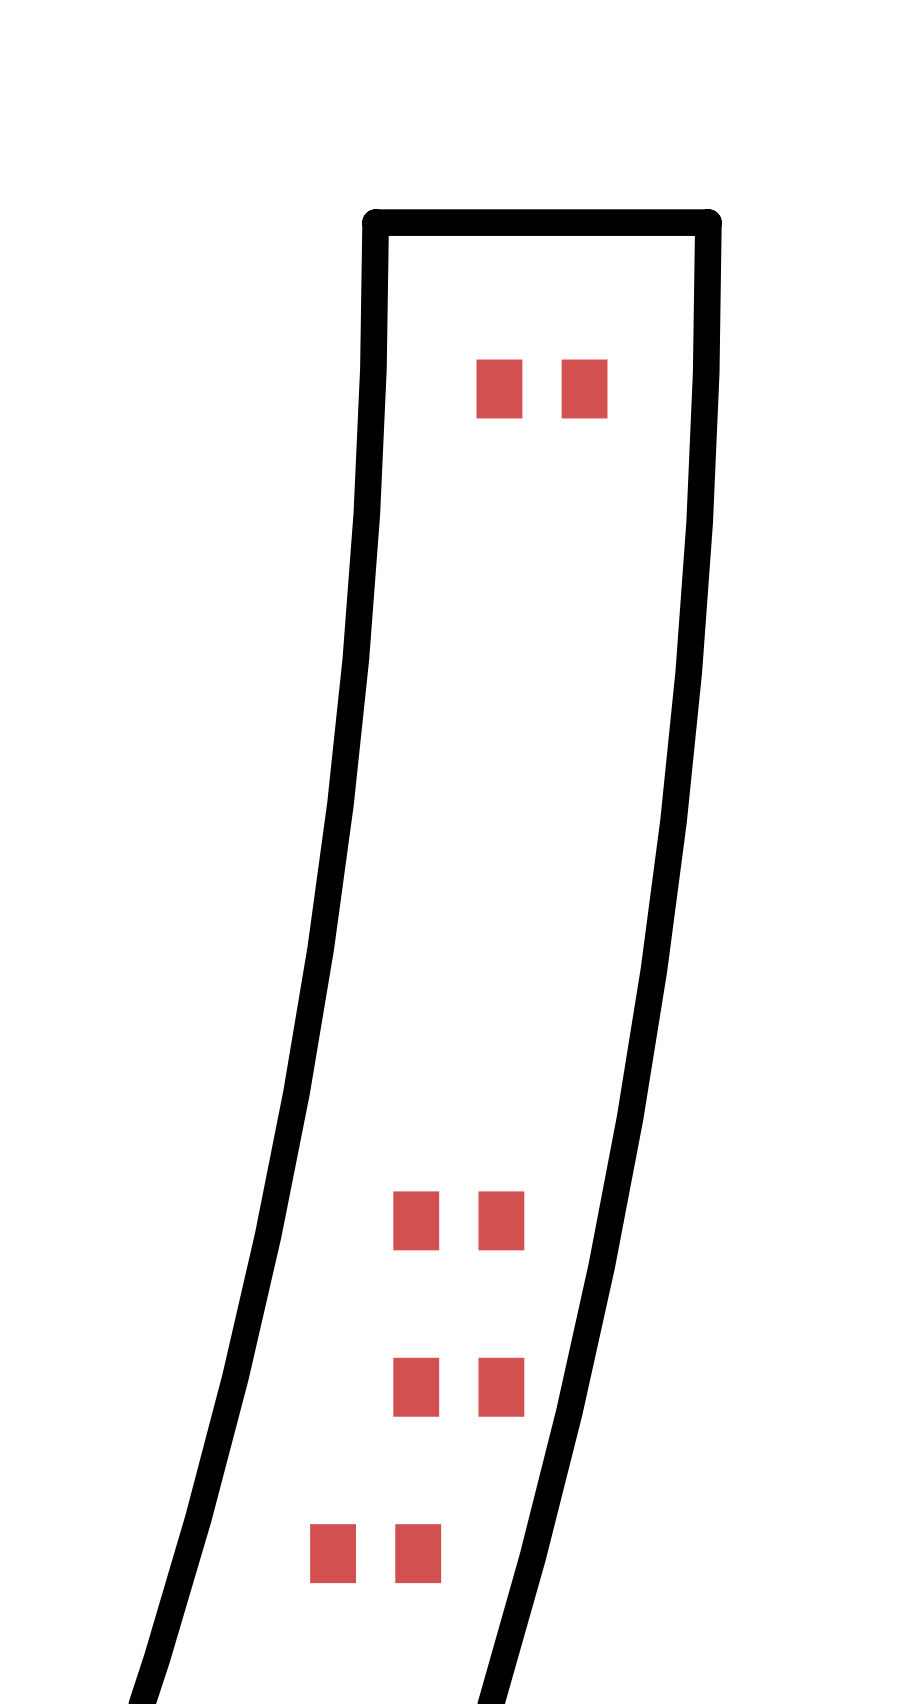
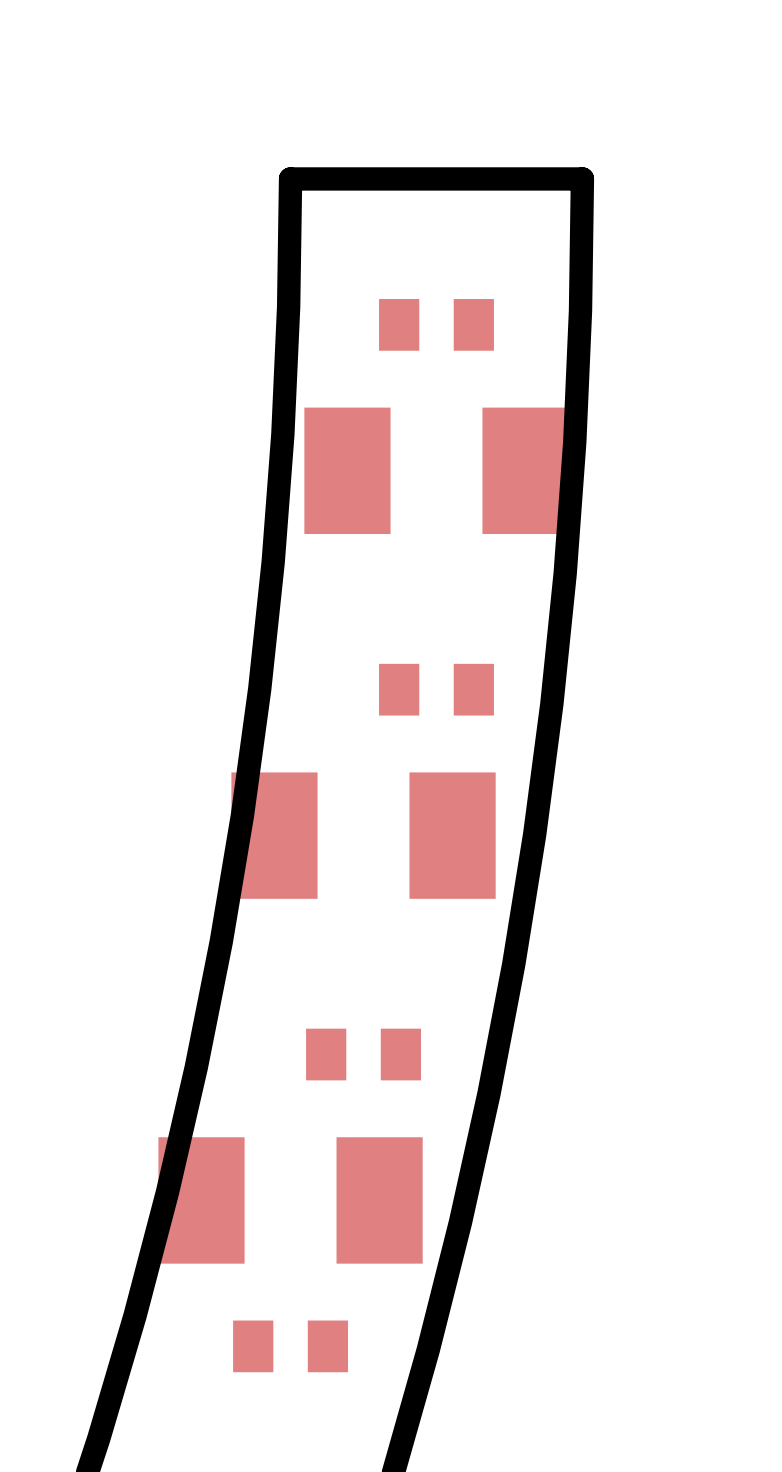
part: none -> (436, 470)
part: none -> (363, 835)
part: none -> (290, 1200)
part position: (458, 1387) -> (436, 689)

